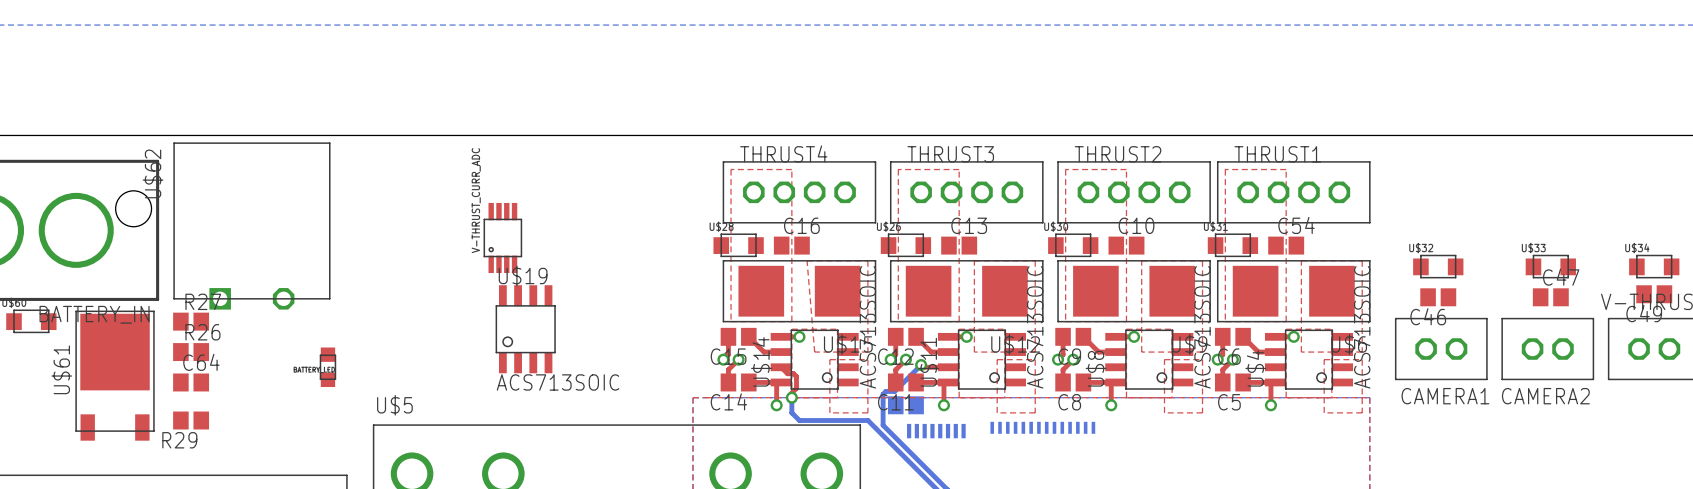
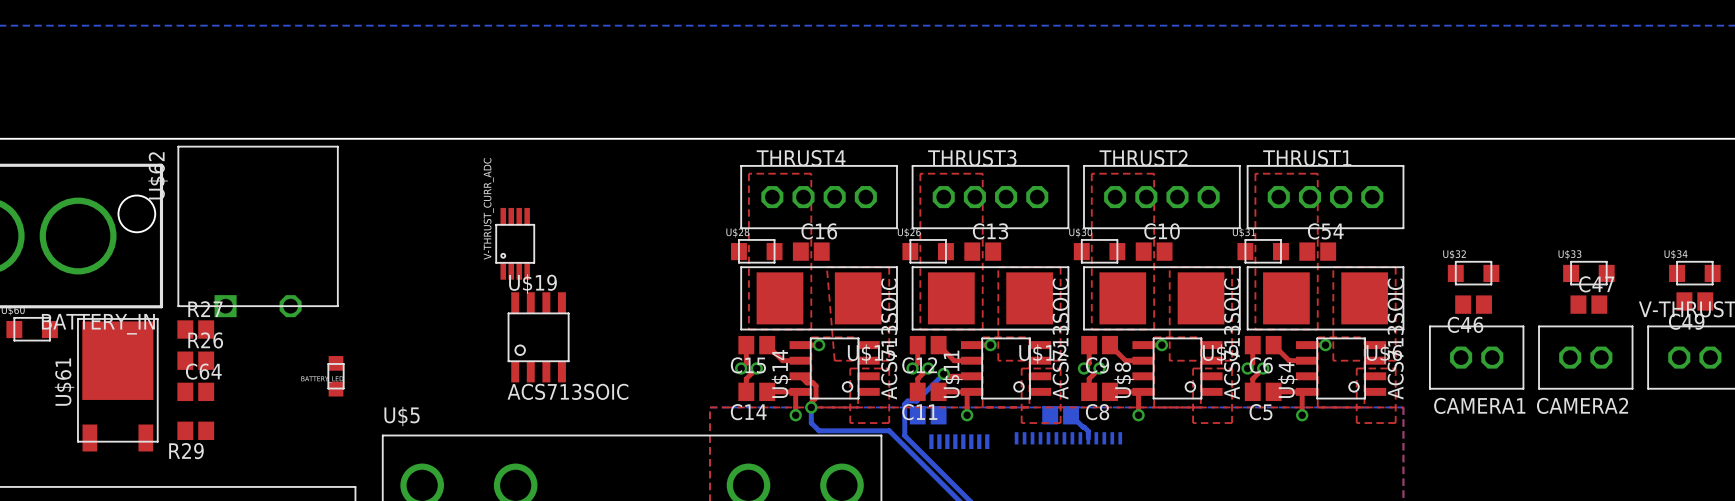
part: none -> (1060, 415)
bottom track: none -> (1071, 415) (1088, 431) (1088, 438)

